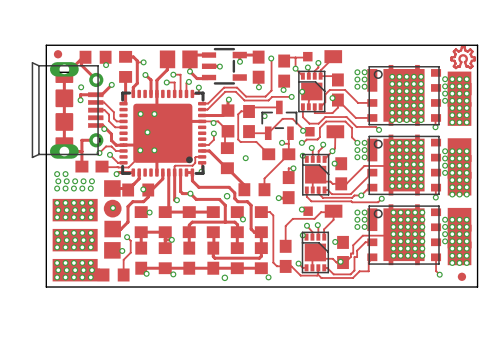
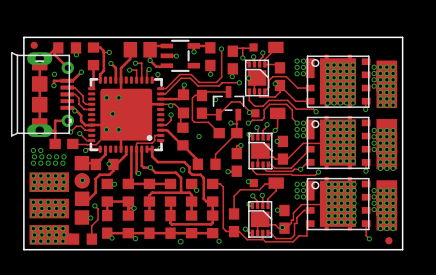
drawing: [450, 45, 477, 70] -> none

